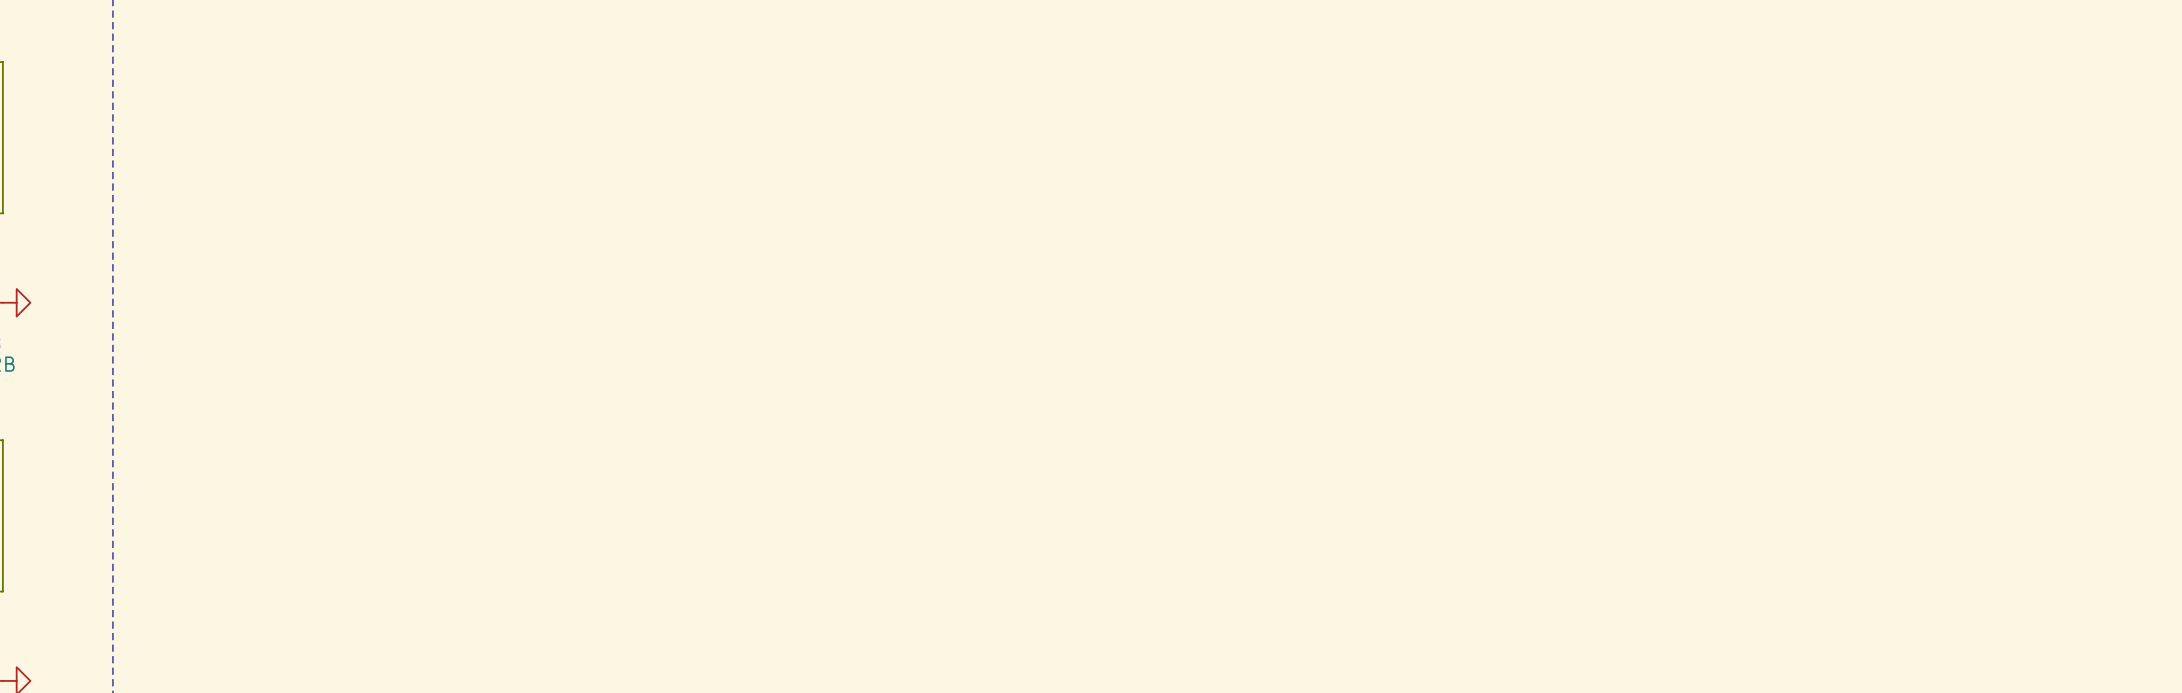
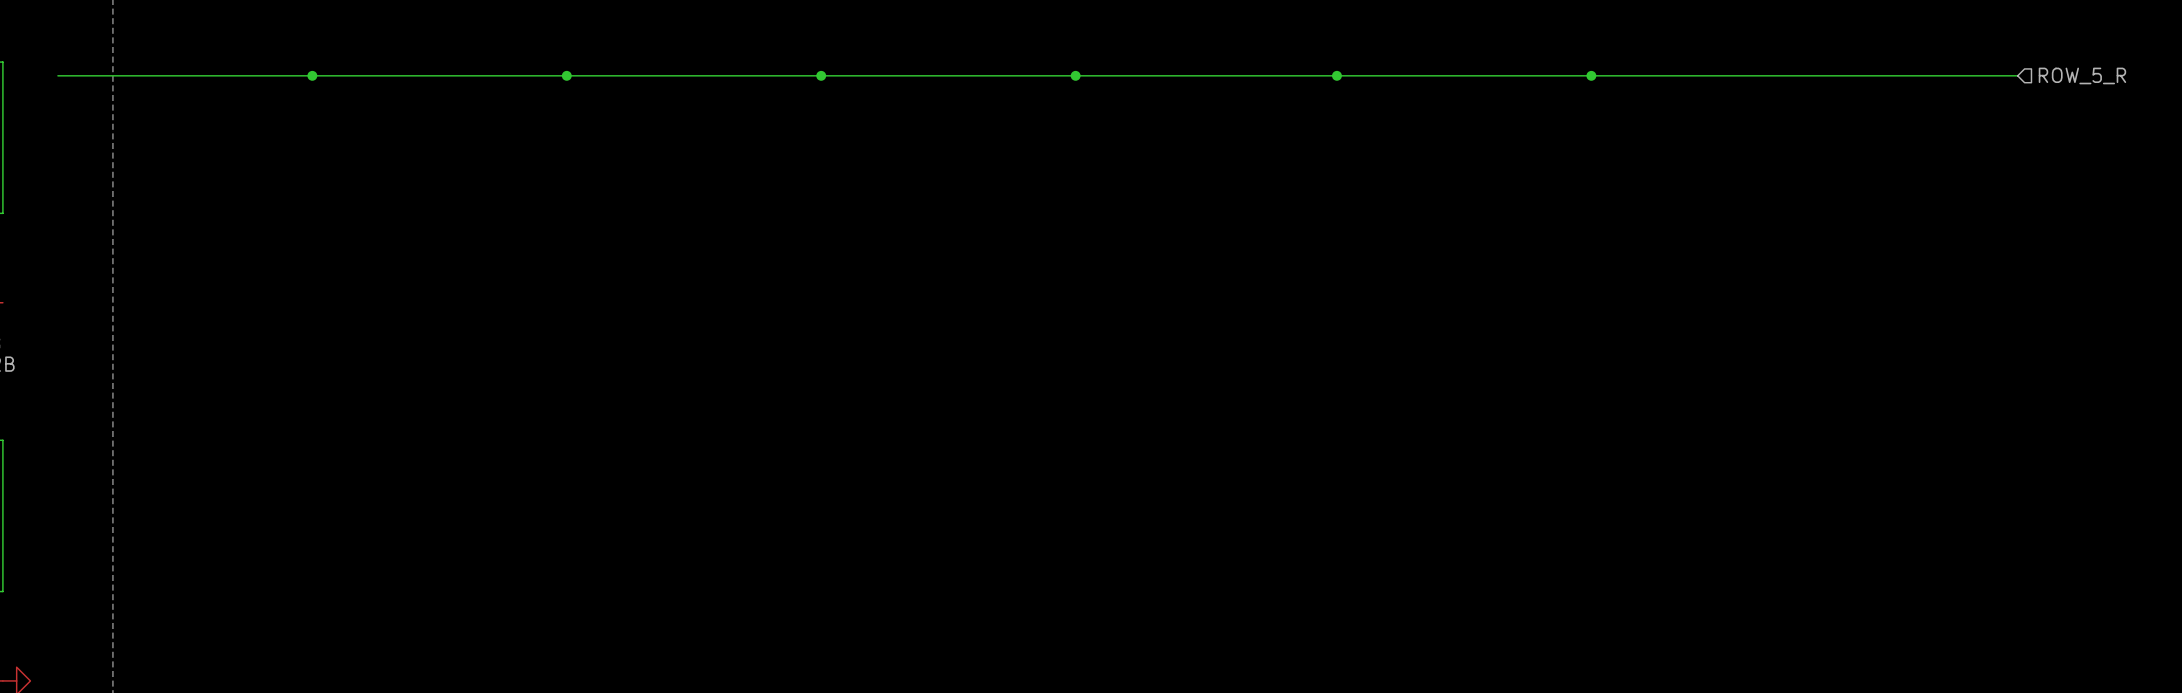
wire: none -> (57, 75) (2017, 75)
junction: none -> (312, 75)
junction: none -> (566, 75)
junction: none -> (821, 75)
junction: none -> (1075, 75)
junction: none -> (1336, 75)
junction: none -> (1591, 75)
hierarchical label: none -> ROW_5_R (2082, 75)
power symbol: (16, 302) -> none

